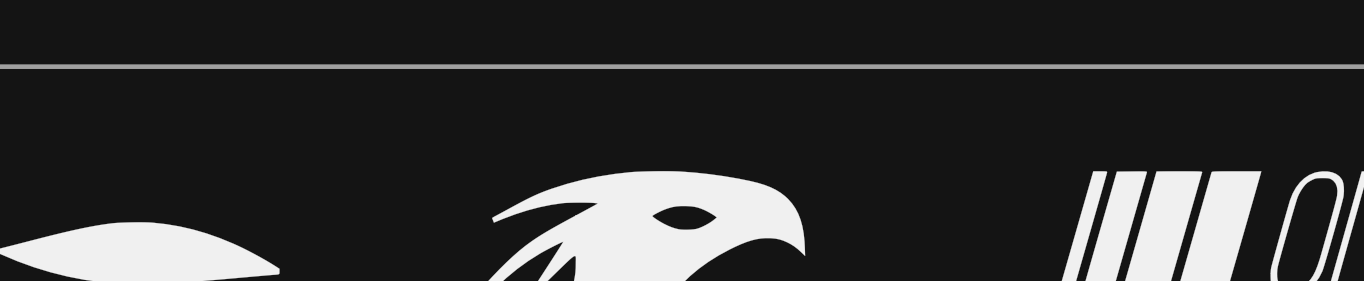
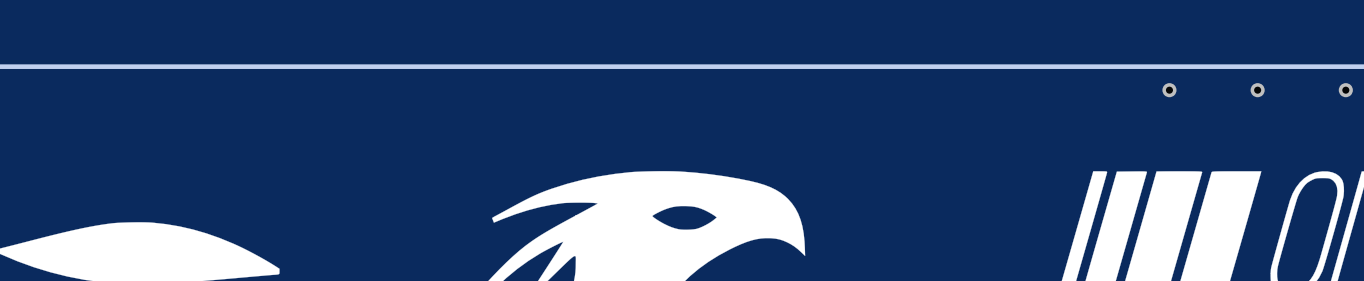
via: none -> (1169, 90)
via: none -> (1257, 90)
via: none -> (1345, 90)

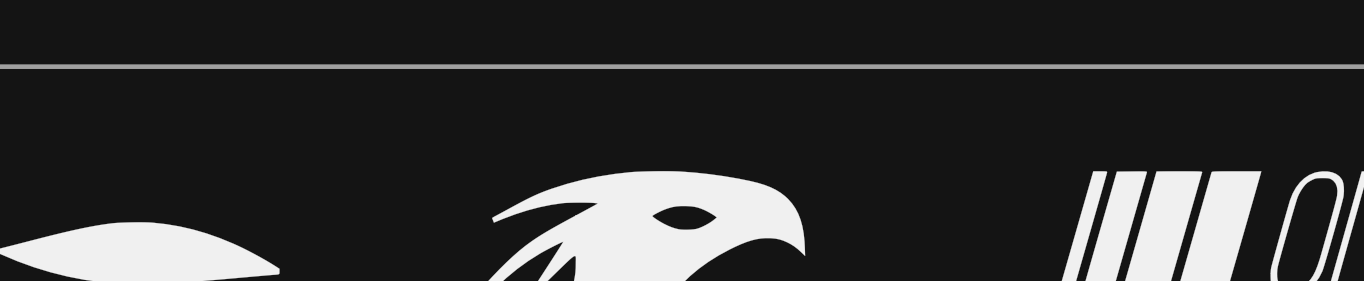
via: (1169, 90) -> none
via: (1257, 90) -> none
via: (1345, 90) -> none

